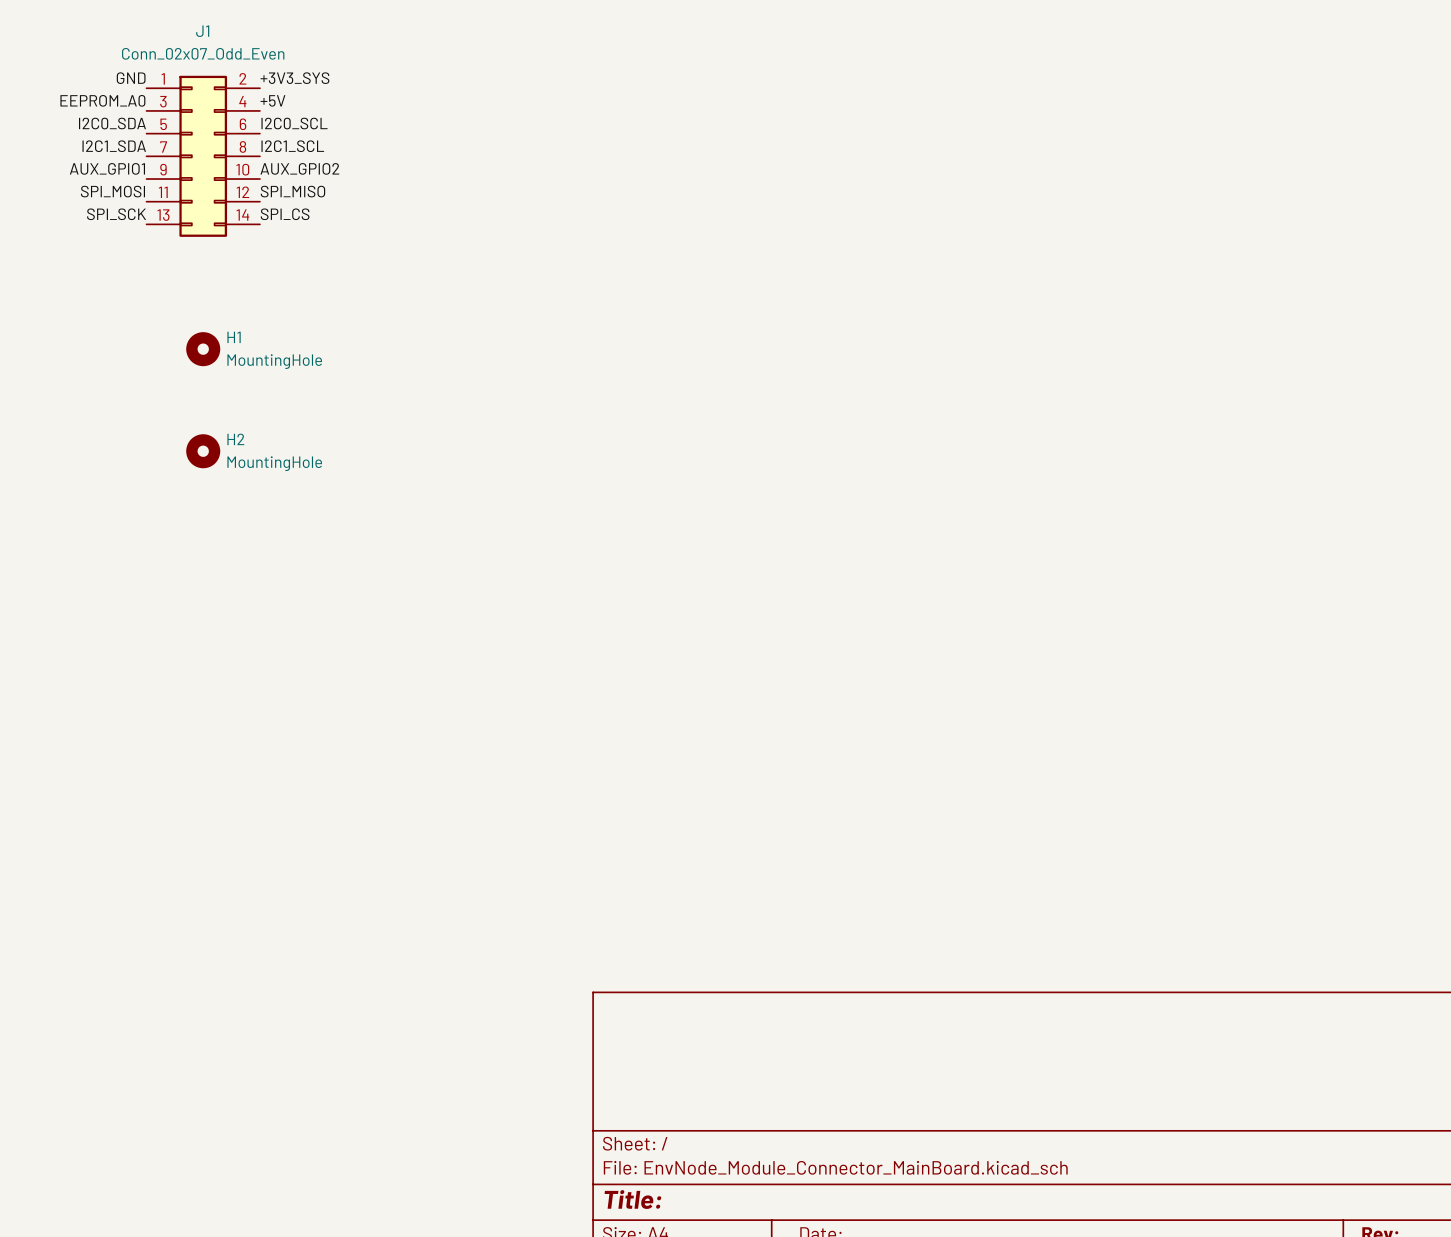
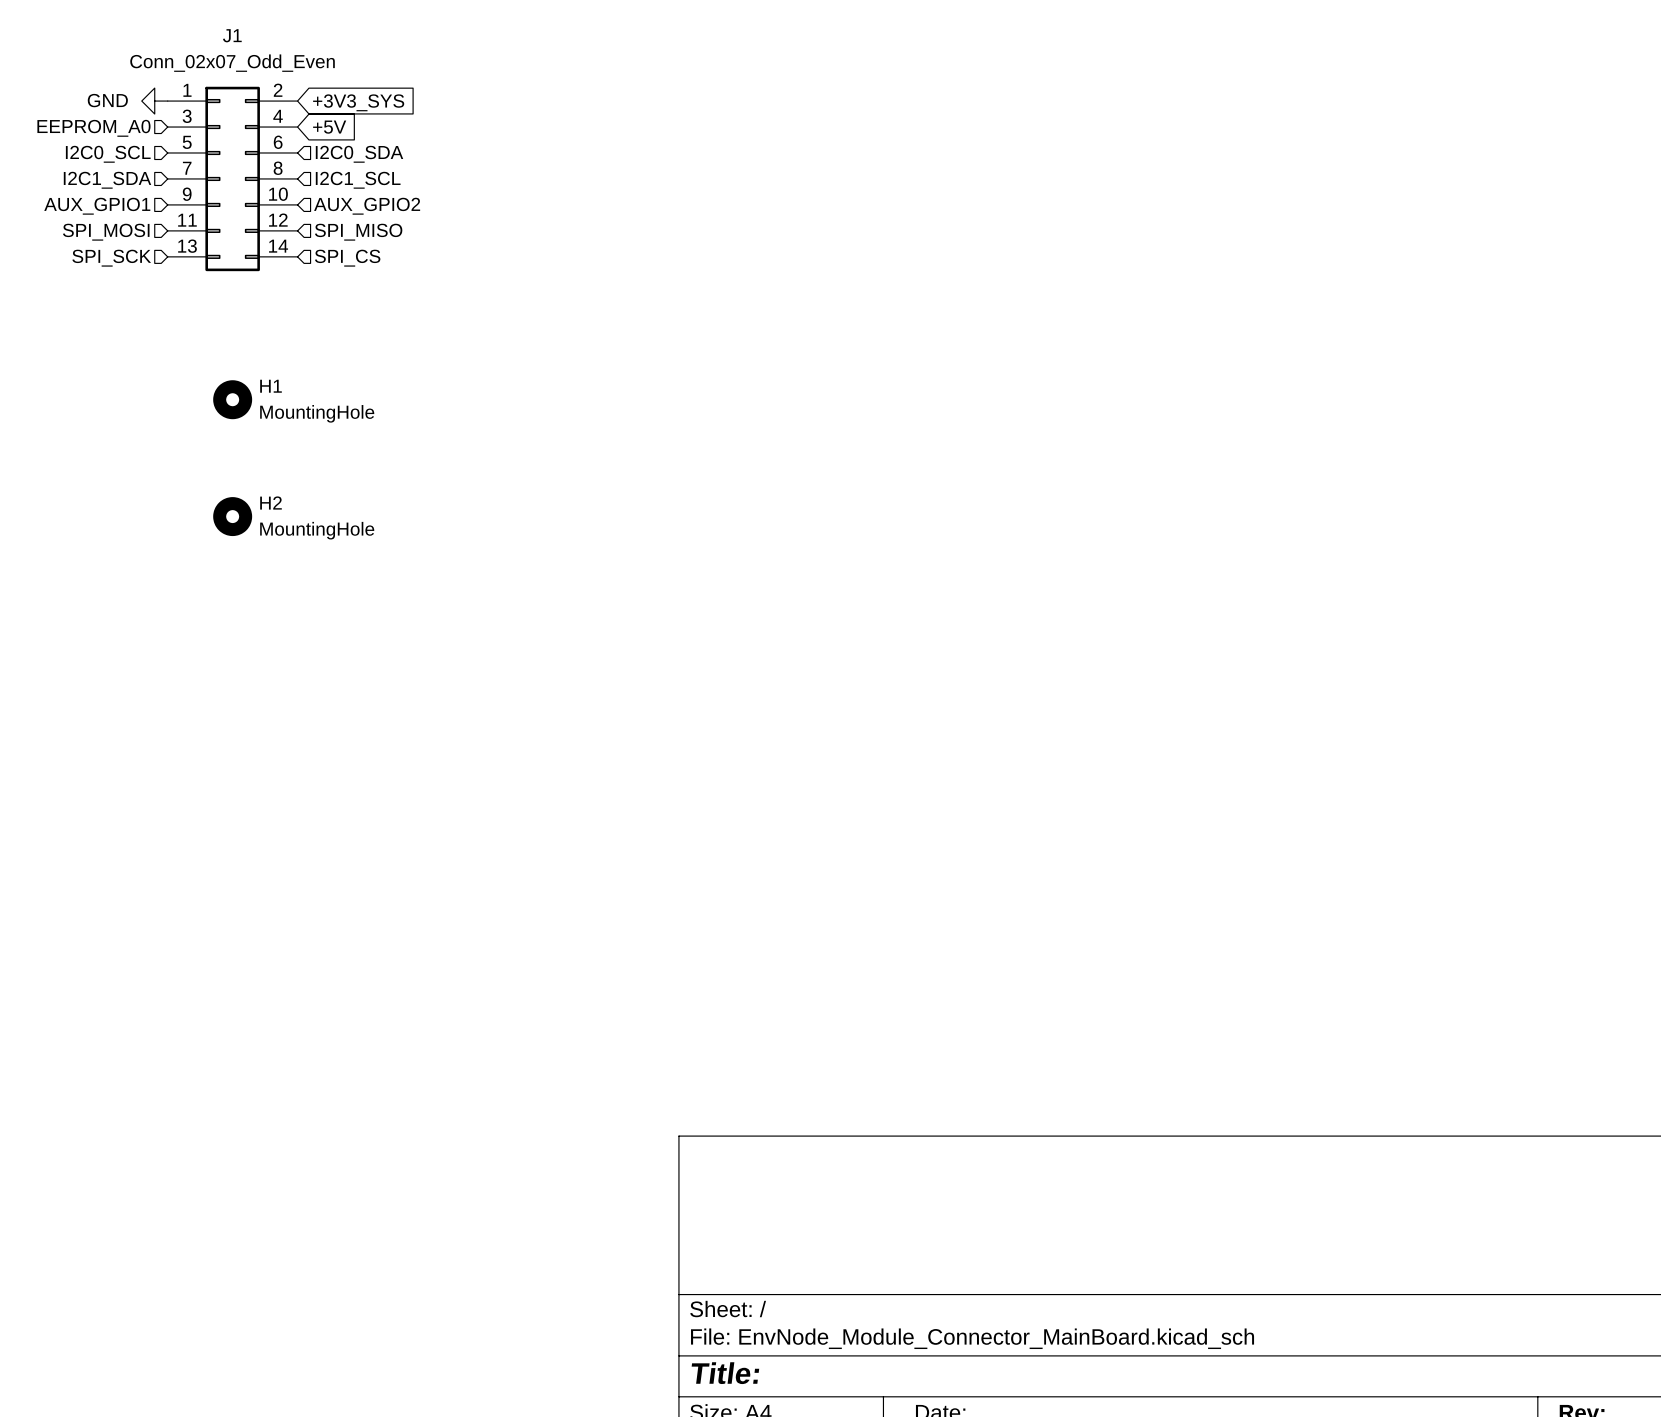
label: GND (131, 78) -> none
label: +3V3_SYS (294, 78) -> none
power symbol: none -> GND (154, 101)
global label: none -> +3V3_SYS (358, 102)
label: EEPROM_A0 (102, 100) -> none
label: +5V (272, 100) -> none
hierarchical label: none -> EEPROM_A0 (93, 128)
global label: none -> +5V (329, 127)
label: I2C0_SDA (112, 123) -> none
label: I2C0_SCL (294, 123) -> none
hierarchical label: none -> I2C0_SCL (108, 154)
hierarchical label: none -> I2C0_SDA (359, 154)
label: I2C1_SDA (114, 146) -> none
label: I2C1_SCL (292, 146) -> none
hierarchical label: none -> I2C1_SDA (107, 180)
hierarchical label: none -> I2C1_SCL (358, 180)
label: AUX_GPIO1 (107, 168) -> none
label: AUX_GPIO2 (299, 168) -> none
hierarchical label: none -> AUX_GPIO1 (97, 206)
hierarchical label: none -> AUX_GPIO2 (367, 206)
label: SPI_MOSI (112, 191) -> none
label: SPI_MISO (292, 191) -> none
hierarchical label: none -> SPI_MOSI (106, 232)
hierarchical label: none -> SPI_MISO (358, 232)
label: SPI_SCK (116, 214) -> none
label: SPI_CS (285, 214) -> none
hierarchical label: none -> SPI_SCK (111, 258)
hierarchical label: none -> SPI_CS (347, 258)

